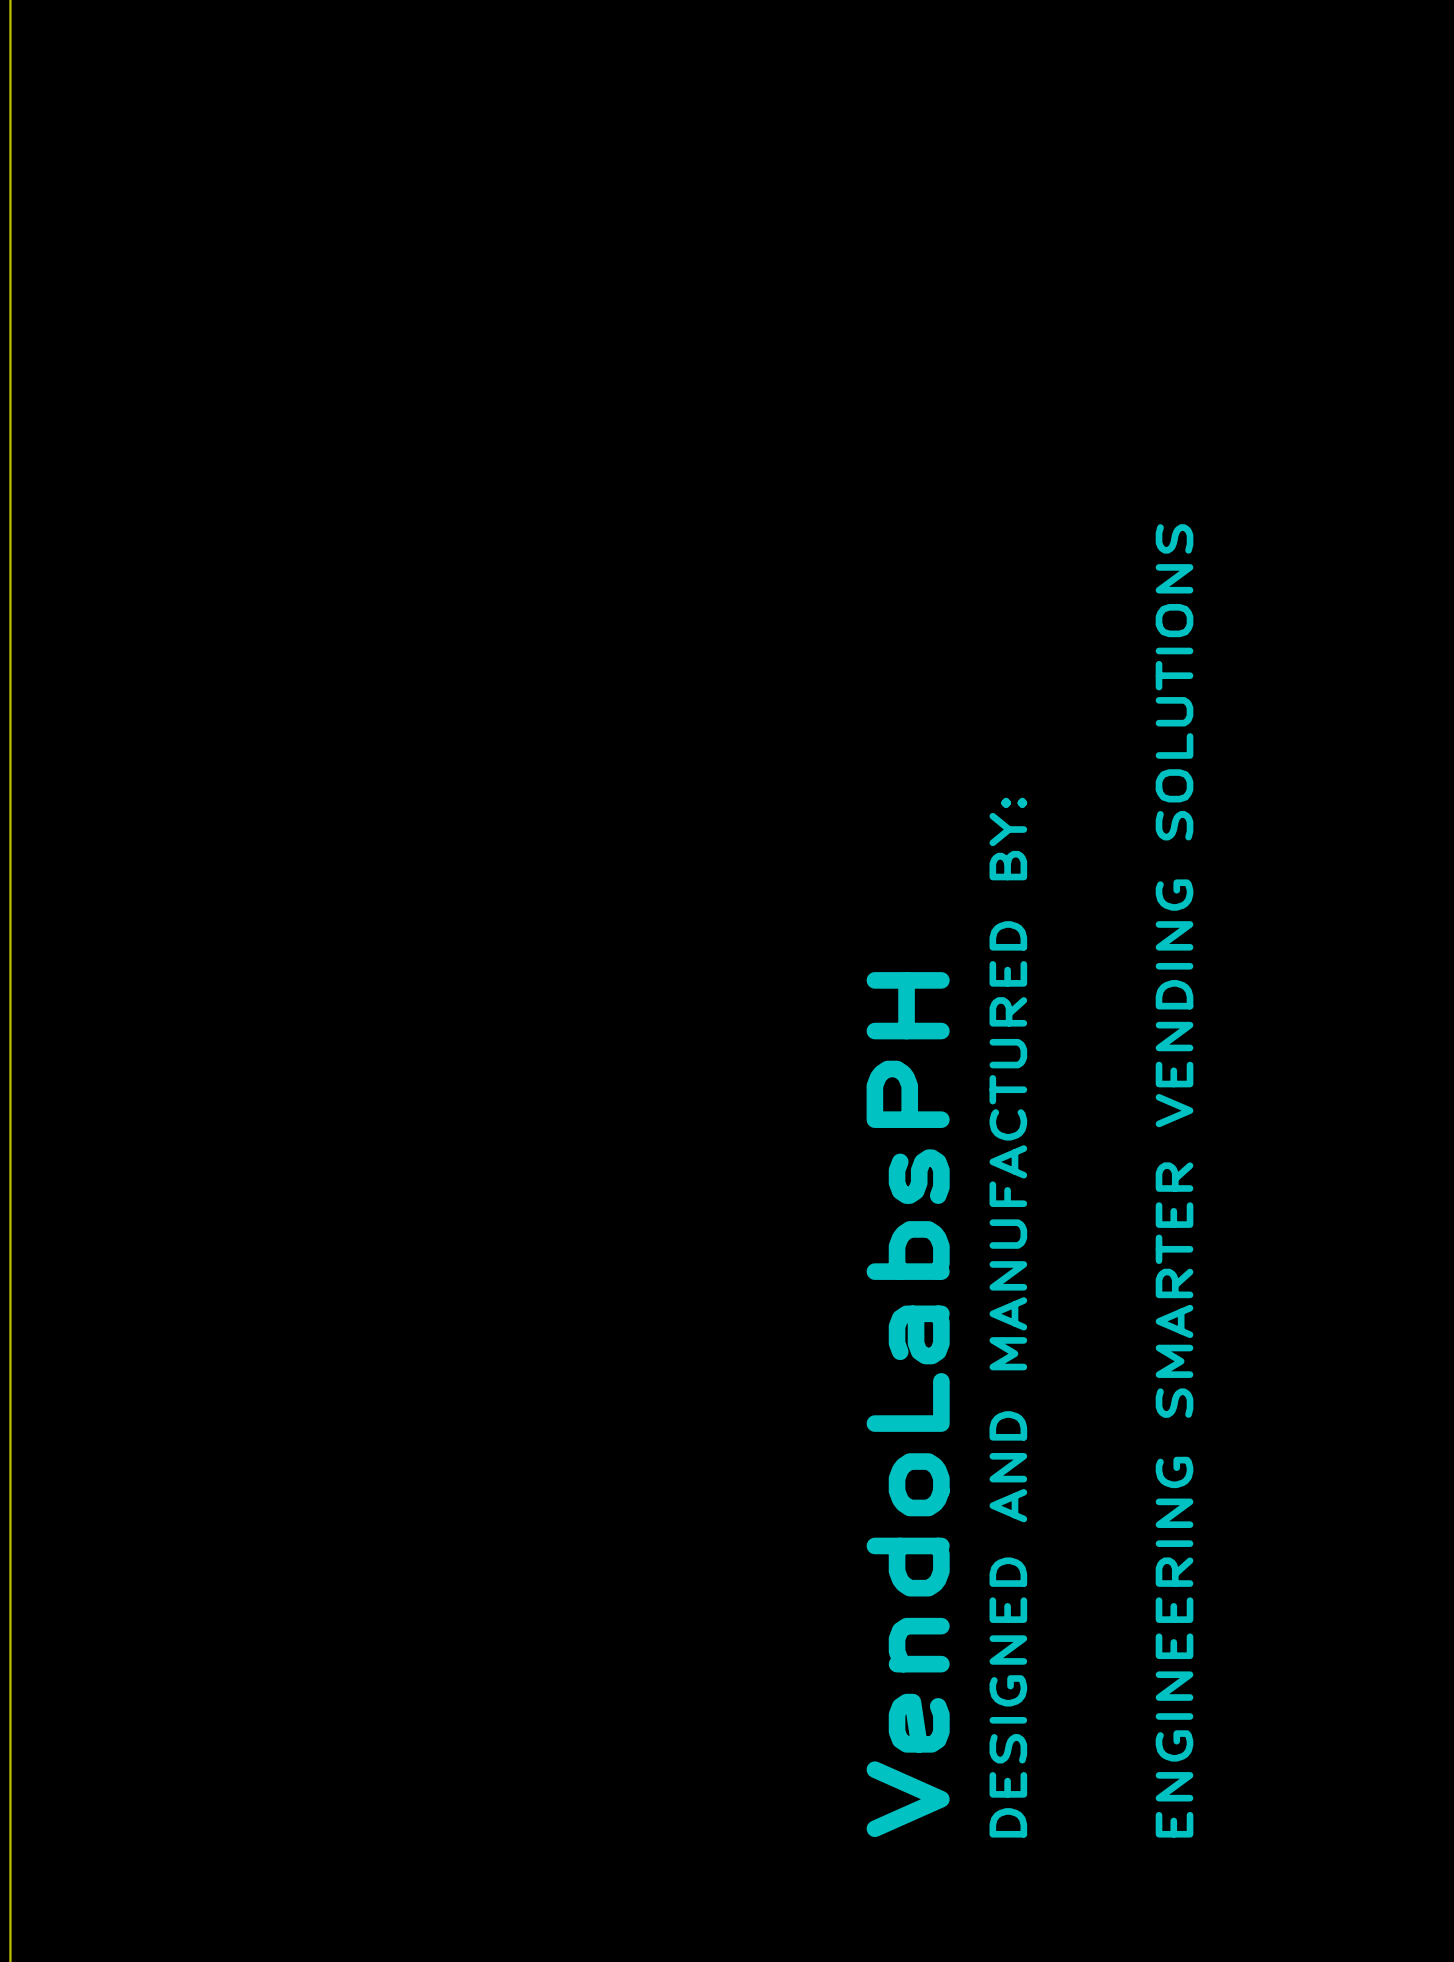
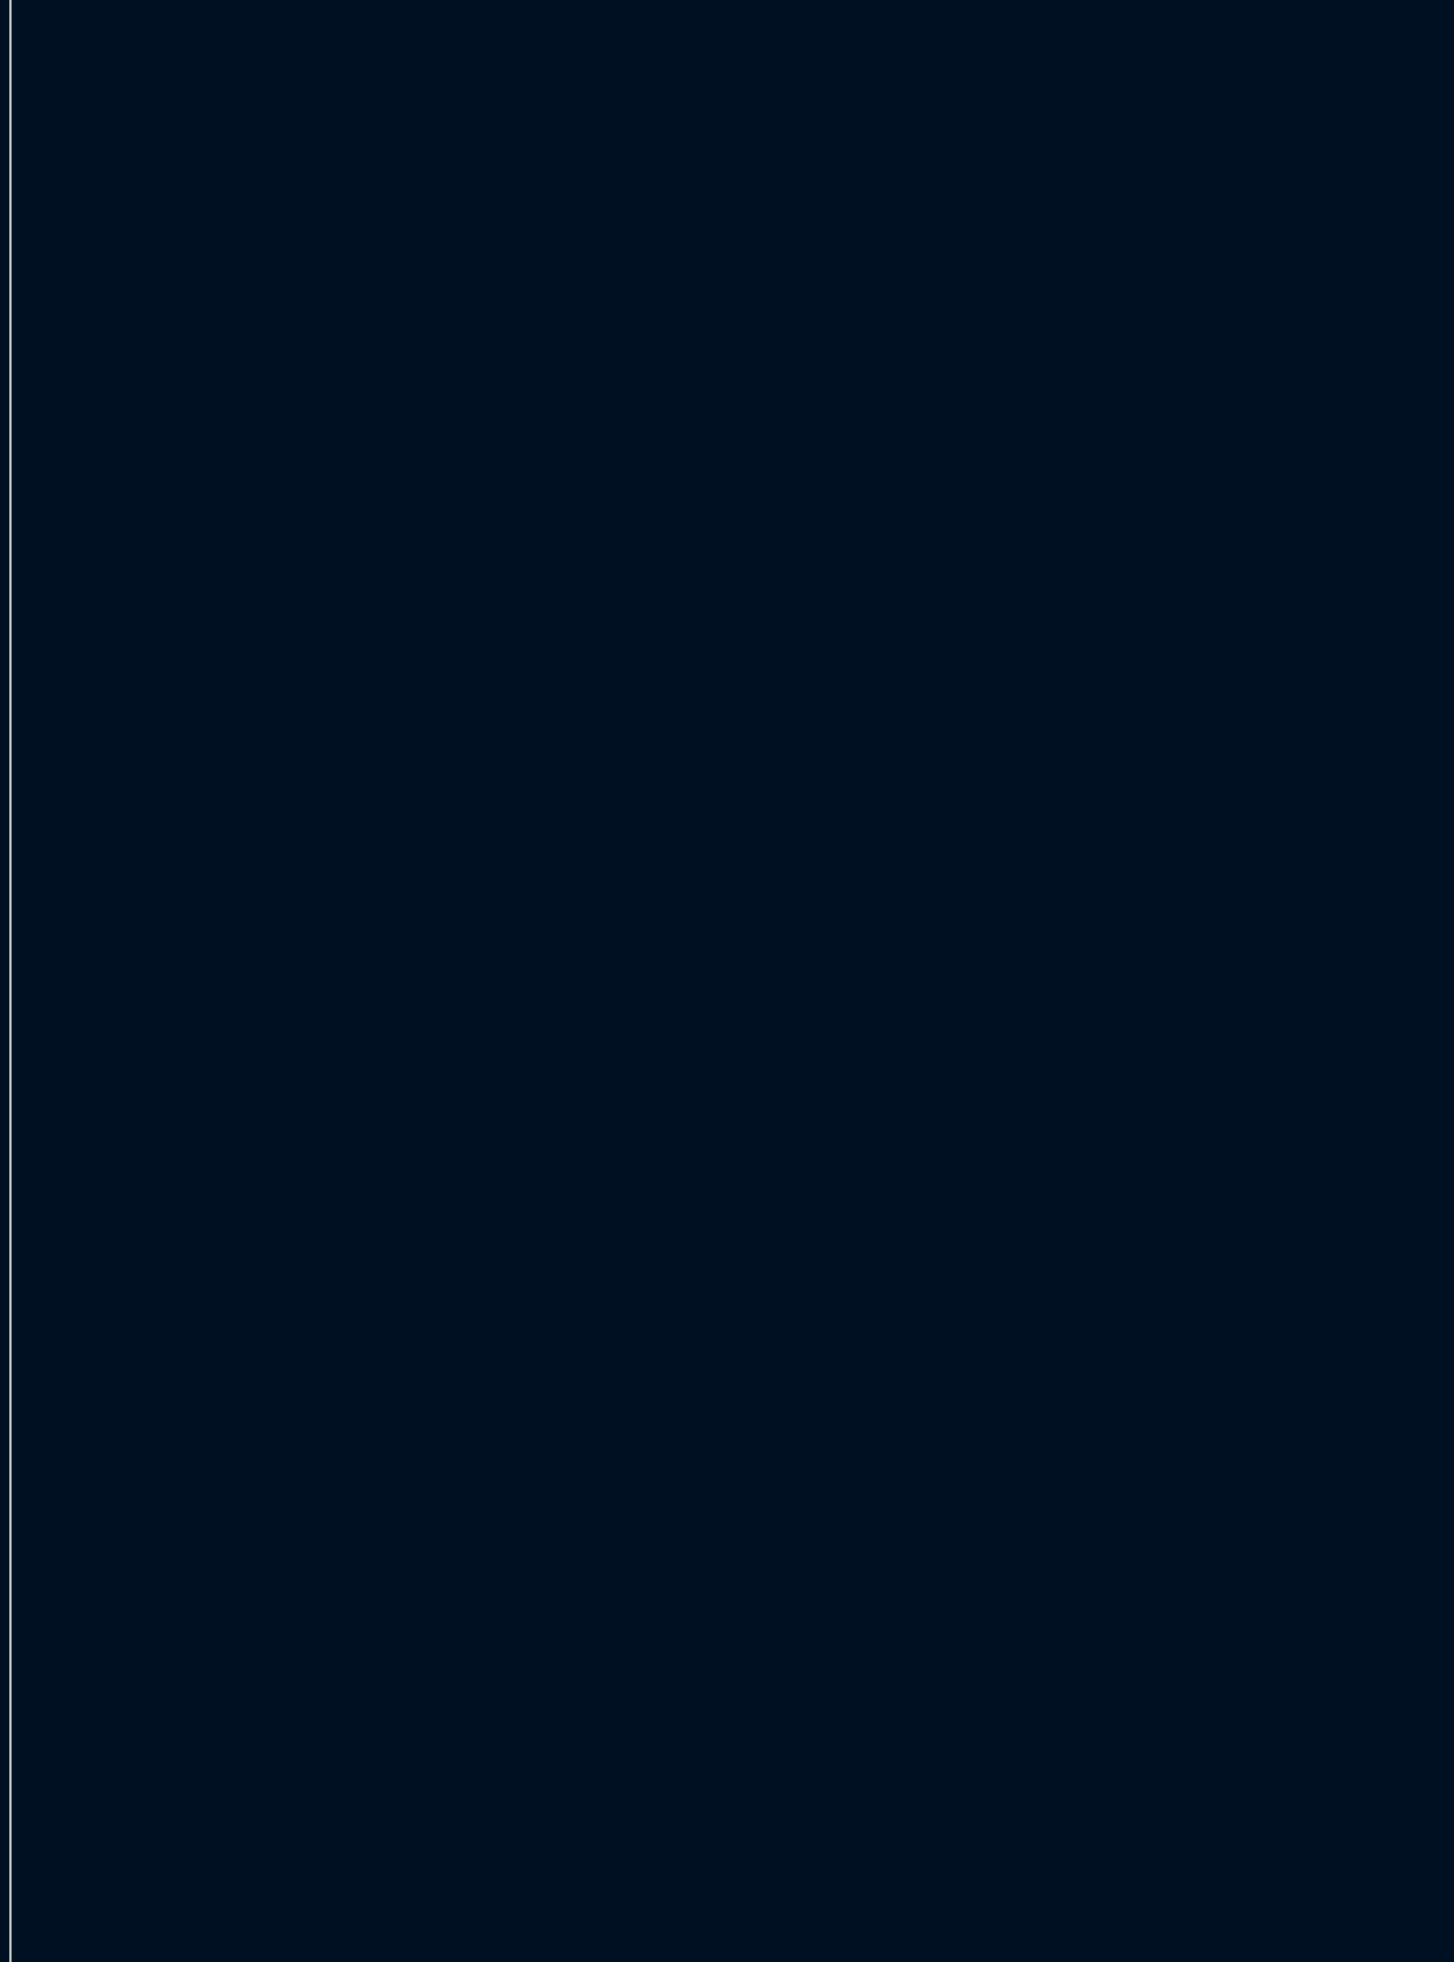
text: ENGINEERING SMARTER VENDING SOLUTIONS (1174, 1180) -> none
text: DESIGNED AND MANUFACTURED BY: (1008, 1317) -> none
text: VendoLabsPH (908, 1404) -> none

